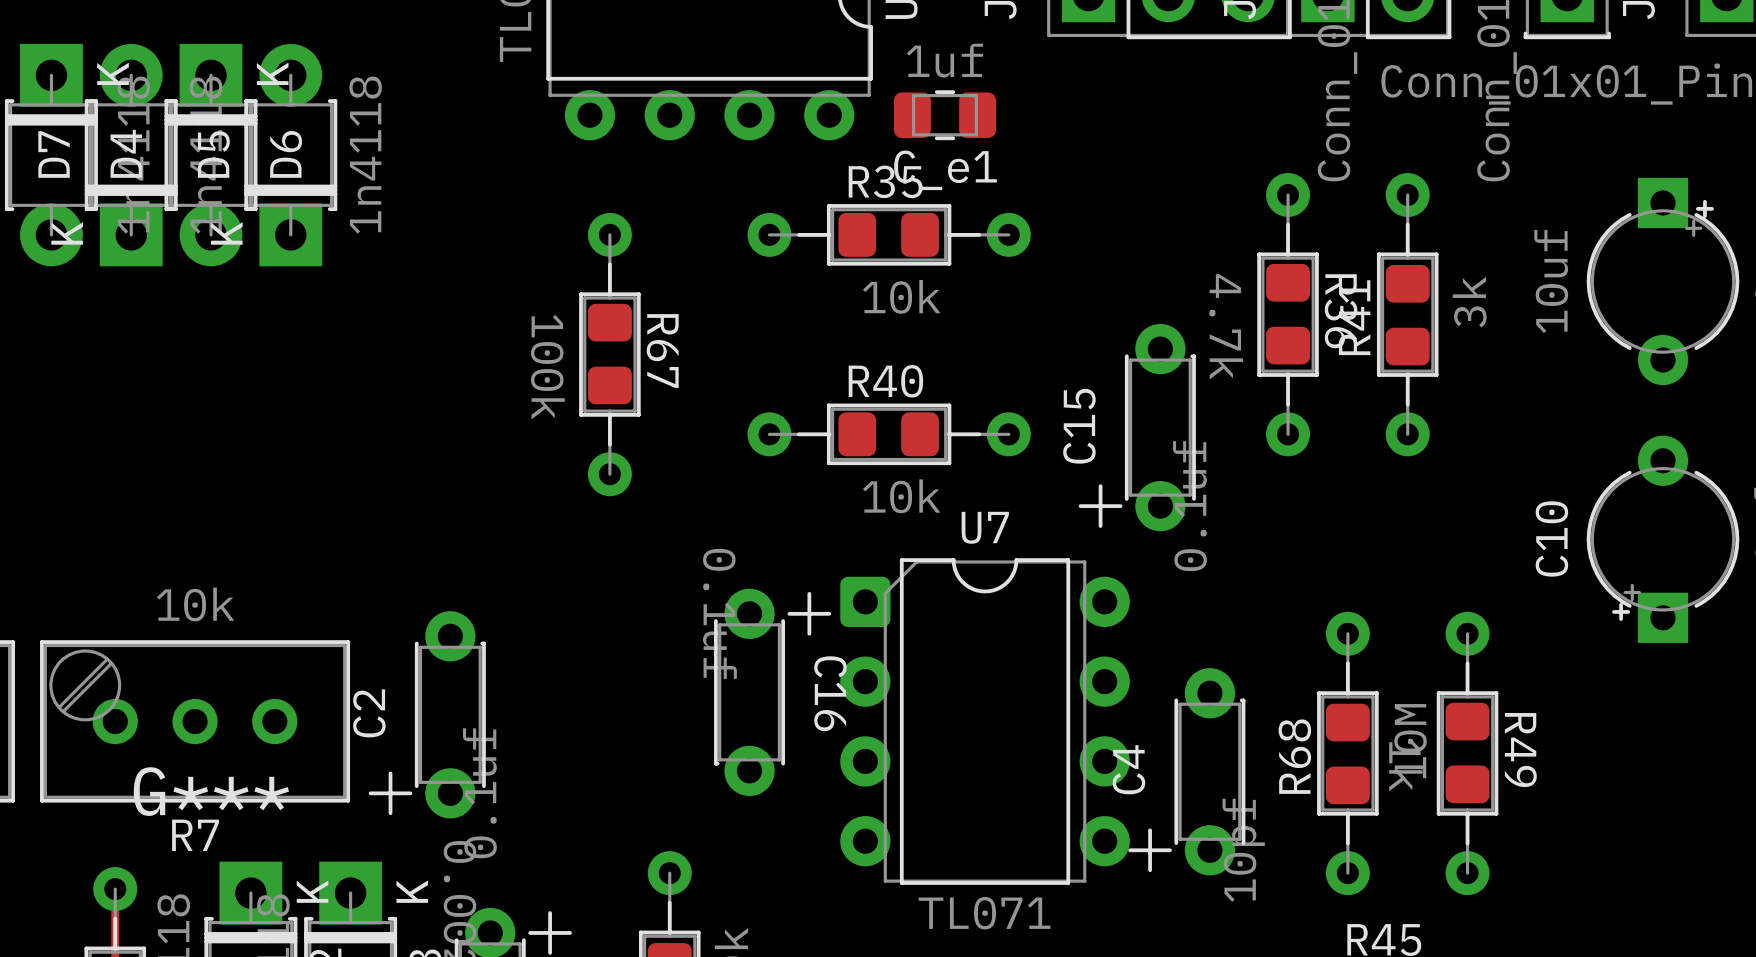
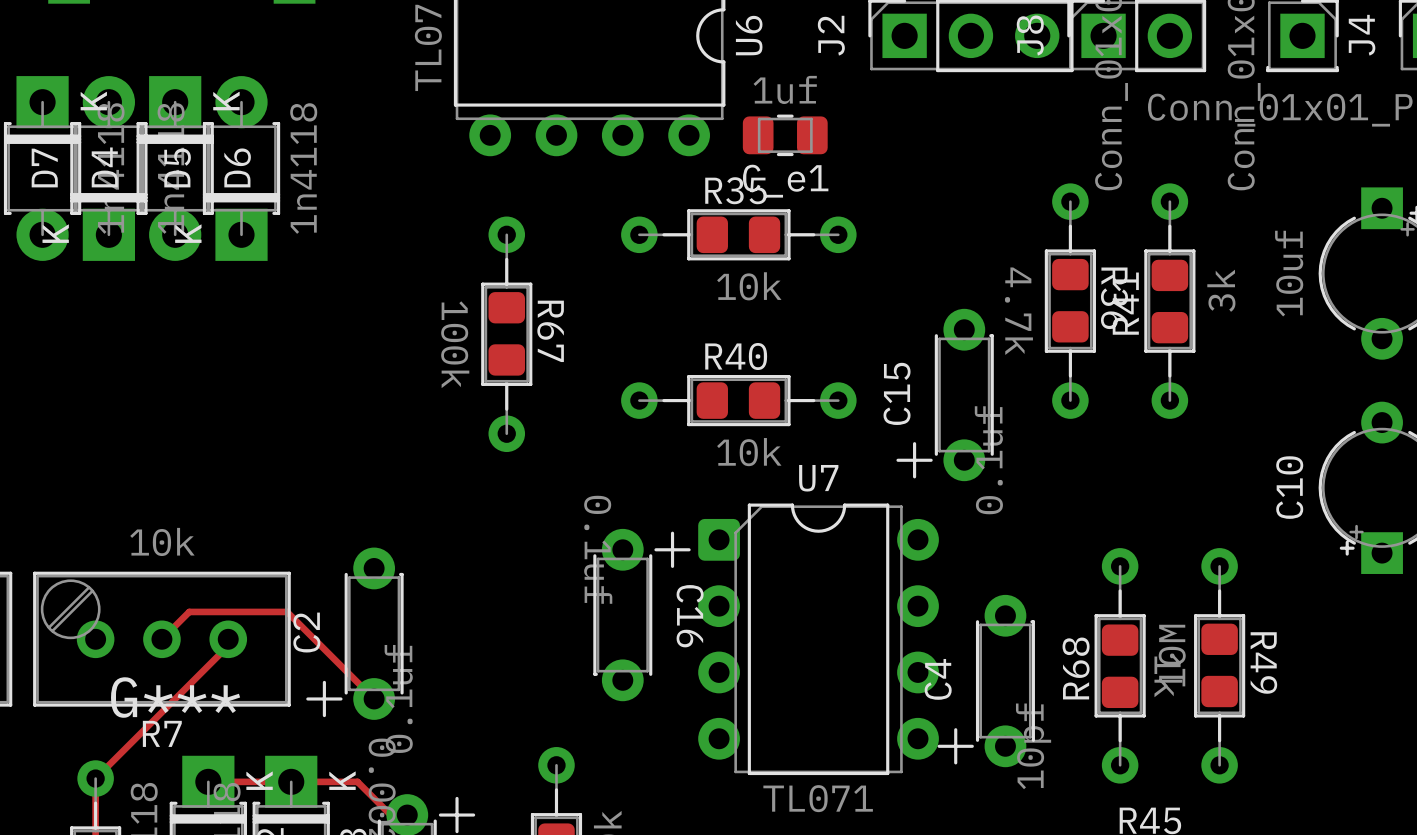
top track: none -> (161, 639) (189, 611) (287, 611) (374, 698)
top track: none -> (228, 639) (228, 645) (95, 778)
top track: none -> (208, 781) (357, 781) (390, 815) (407, 815)

